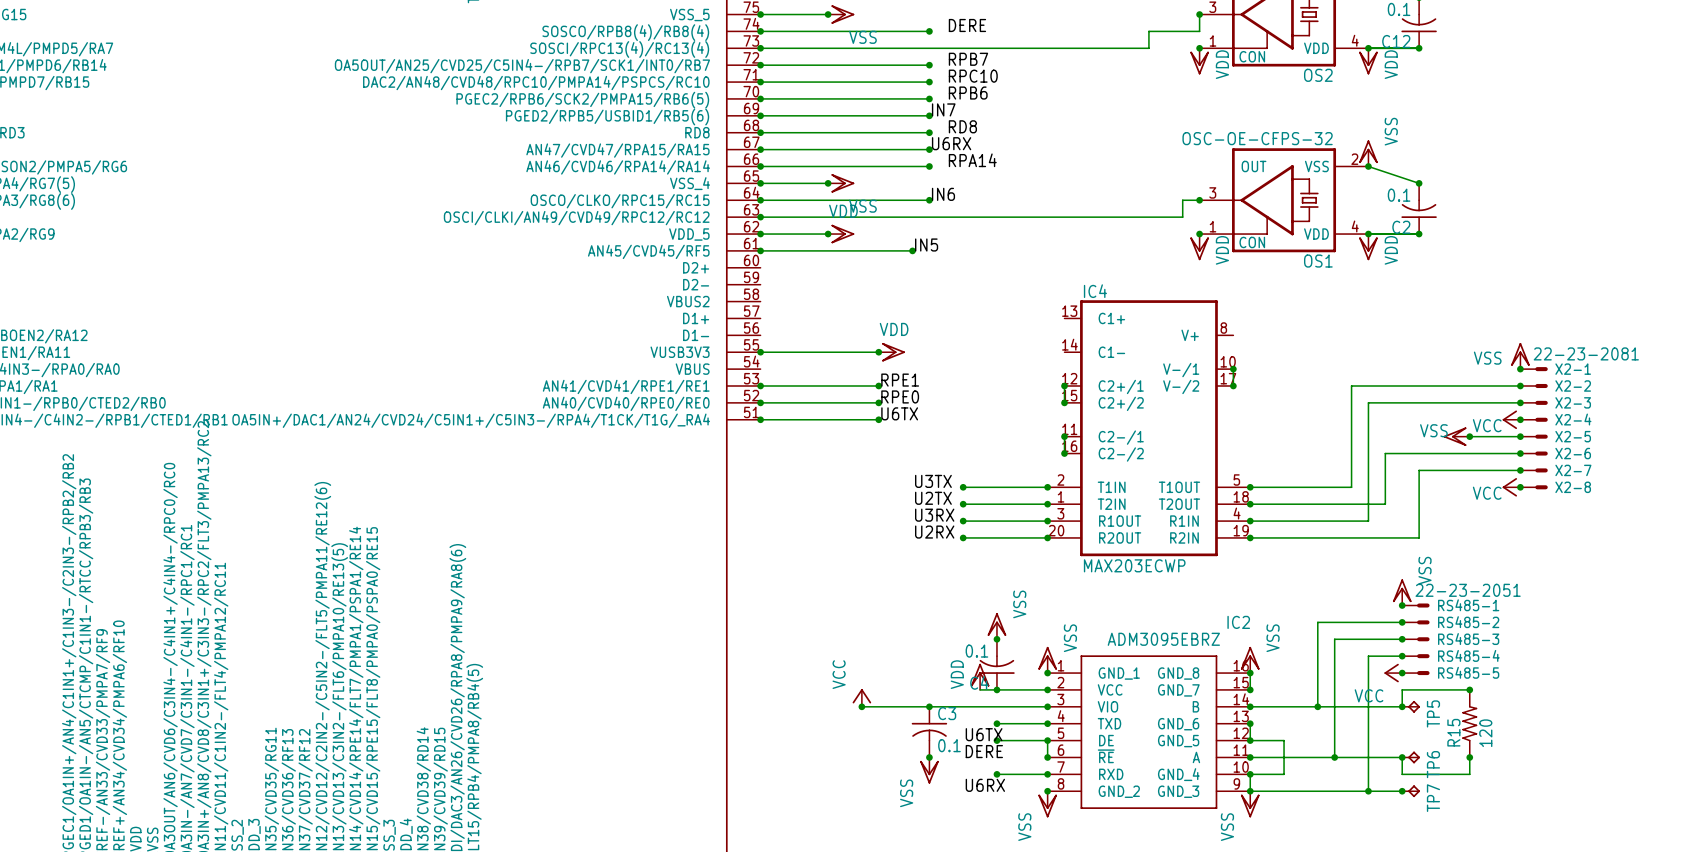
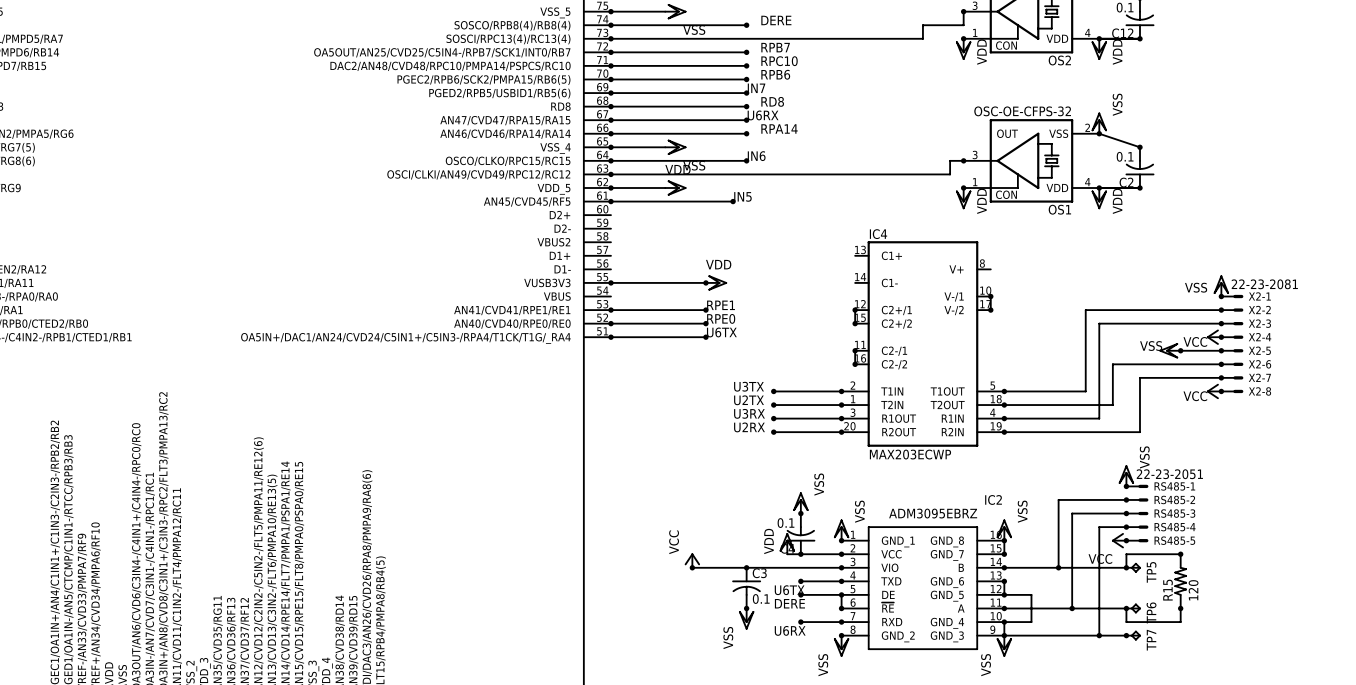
junction: (828, 14) -> none
junction: (828, 183) -> none
junction: (828, 234) -> none

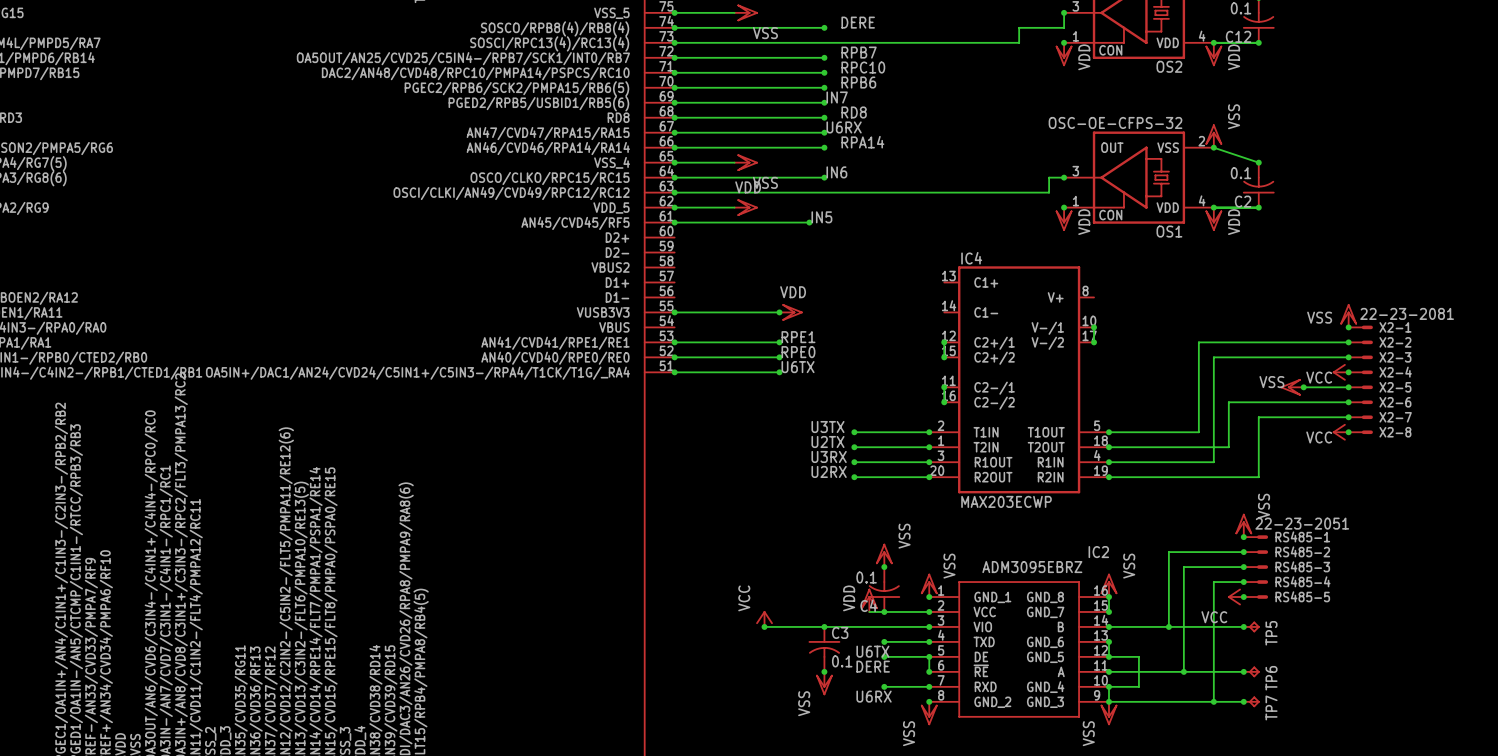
wire: (1180, 554) (1126, 554) (1126, 567) -> none
junction: (1180, 554) -> none
R15: 120 (1180, 581) -> none
wire: (1126, 608) (1126, 622) (1180, 622) (1180, 608) -> none
junction: (1180, 608) -> none

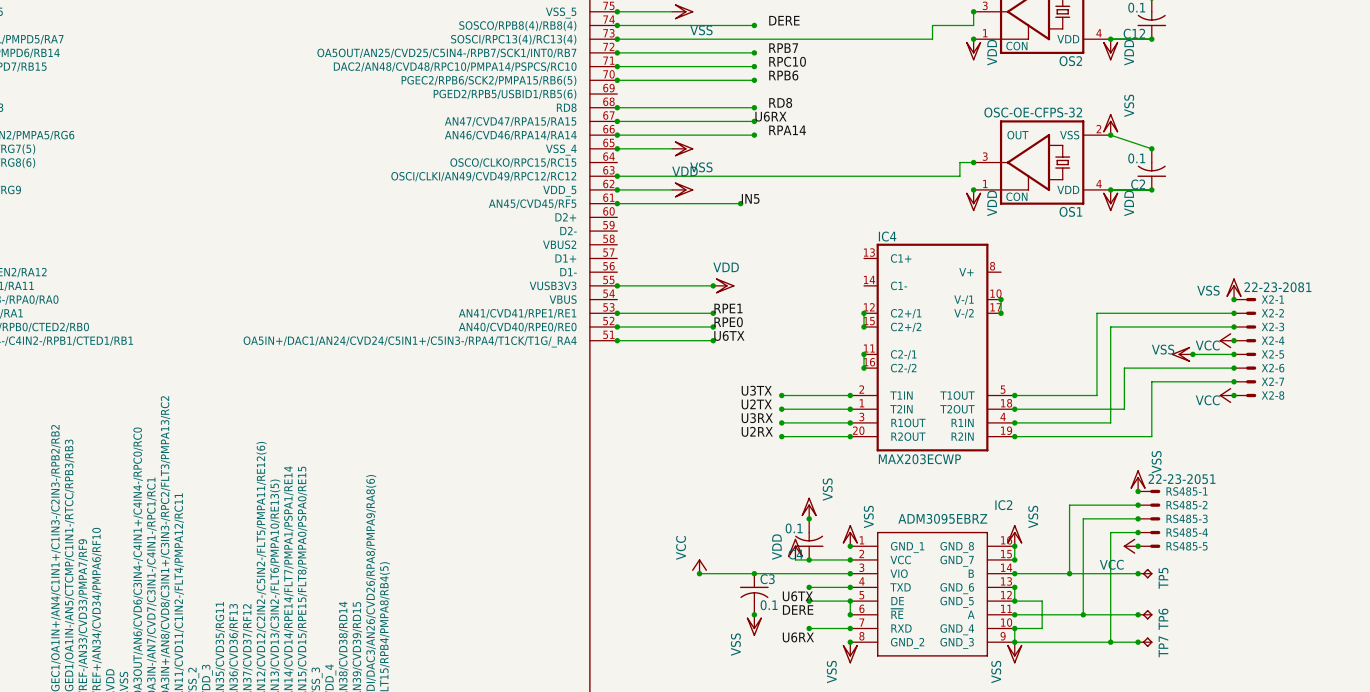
label: IN7 (837, 97) -> none
wire: (674, 102) (824, 102) -> none
junction: (674, 102) -> none
junction: (824, 102) -> none
label: IN6 (836, 172) -> none
wire: (674, 177) (824, 177) -> none
junction: (674, 177) -> none
junction: (824, 177) -> none

